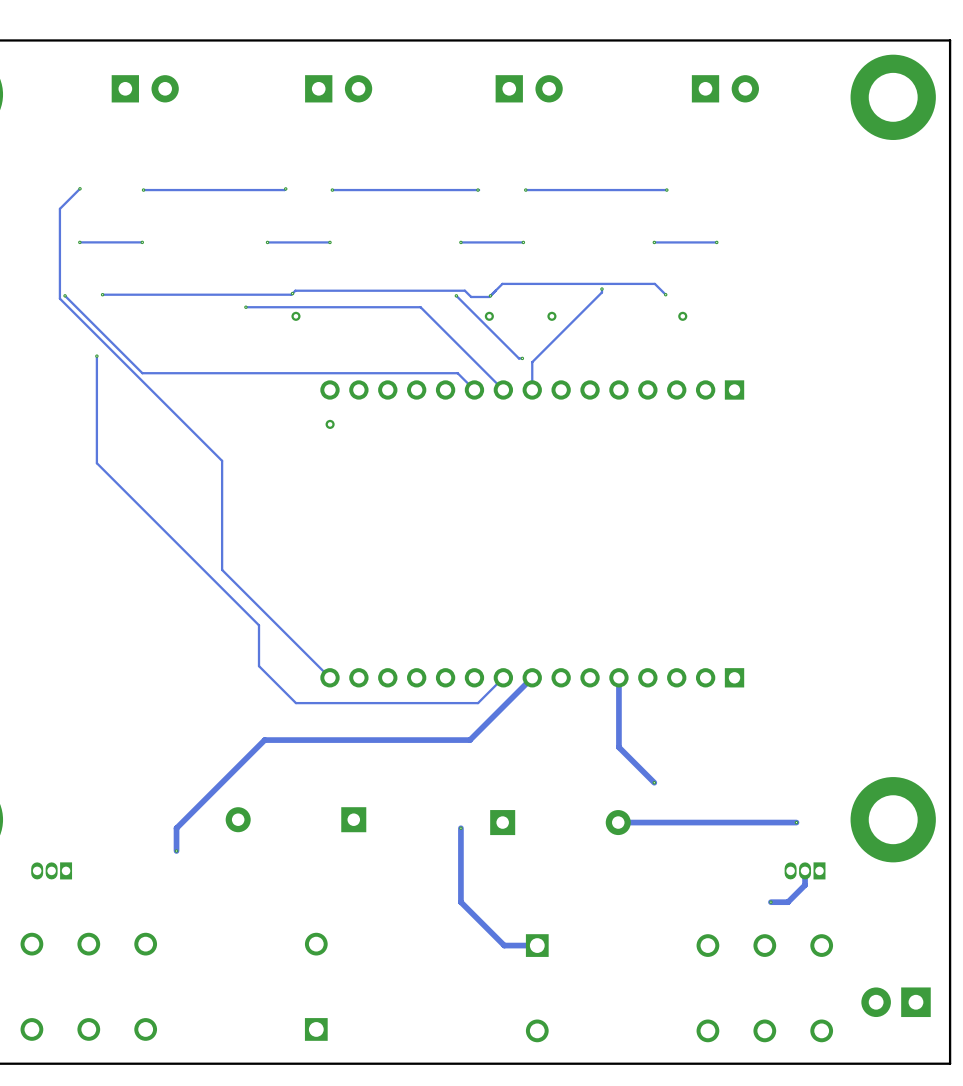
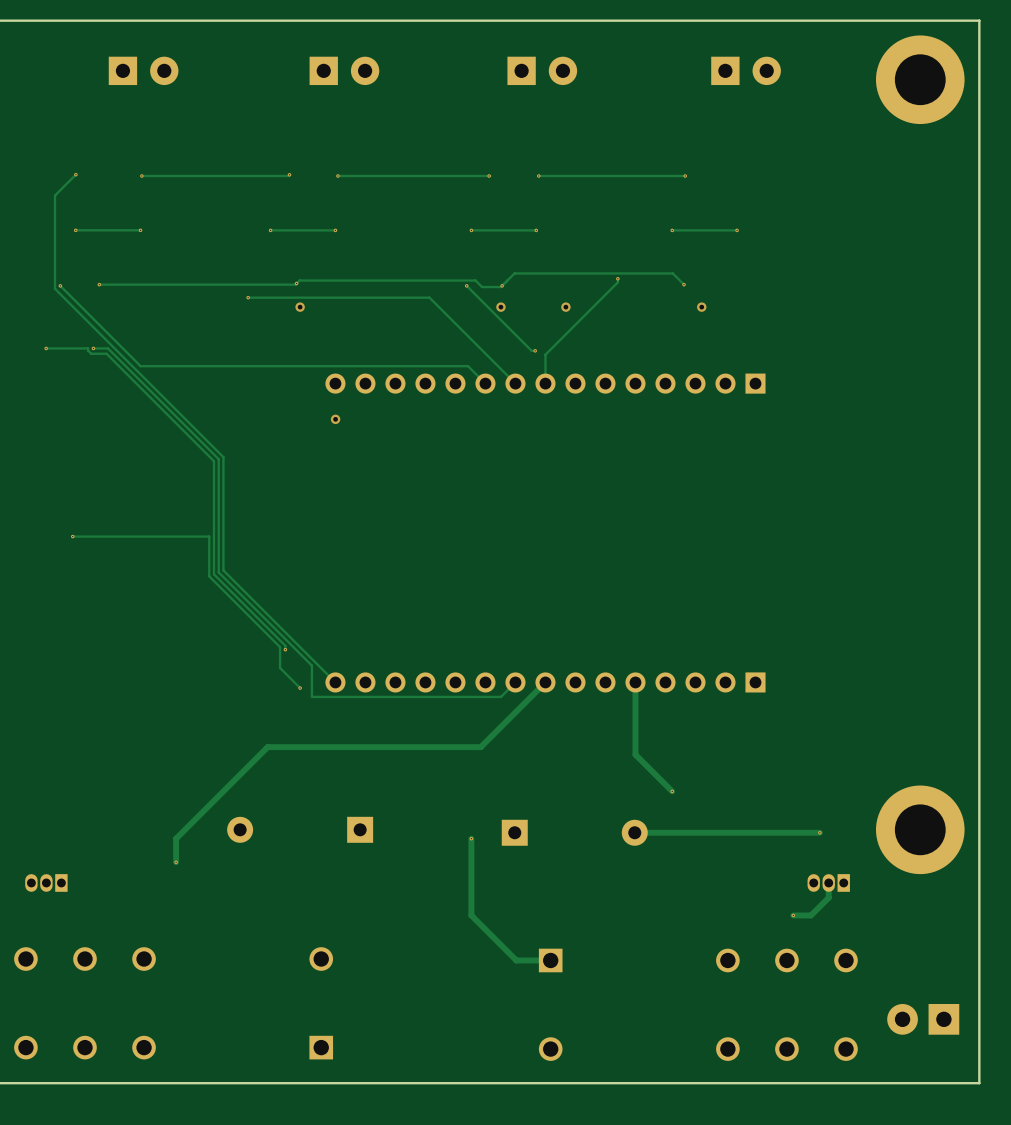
track: none -> (46, 348) (88, 348) (91, 353) (106, 353) (213, 461) (213, 574) (285, 645) (285, 649)
via: none -> (46, 348)
track: (96, 356) (96, 463) (259, 625) (259, 666) (295, 703) (478, 703) (489, 691) -> (93, 348) (107, 348) (218, 459) (218, 572) (311, 665) (311, 696) (501, 696)
track: none -> (72, 536) (209, 536) (209, 576) (280, 647) (280, 667) (300, 688)
via: none -> (72, 536)
via: none -> (285, 649)
via: none -> (300, 688)

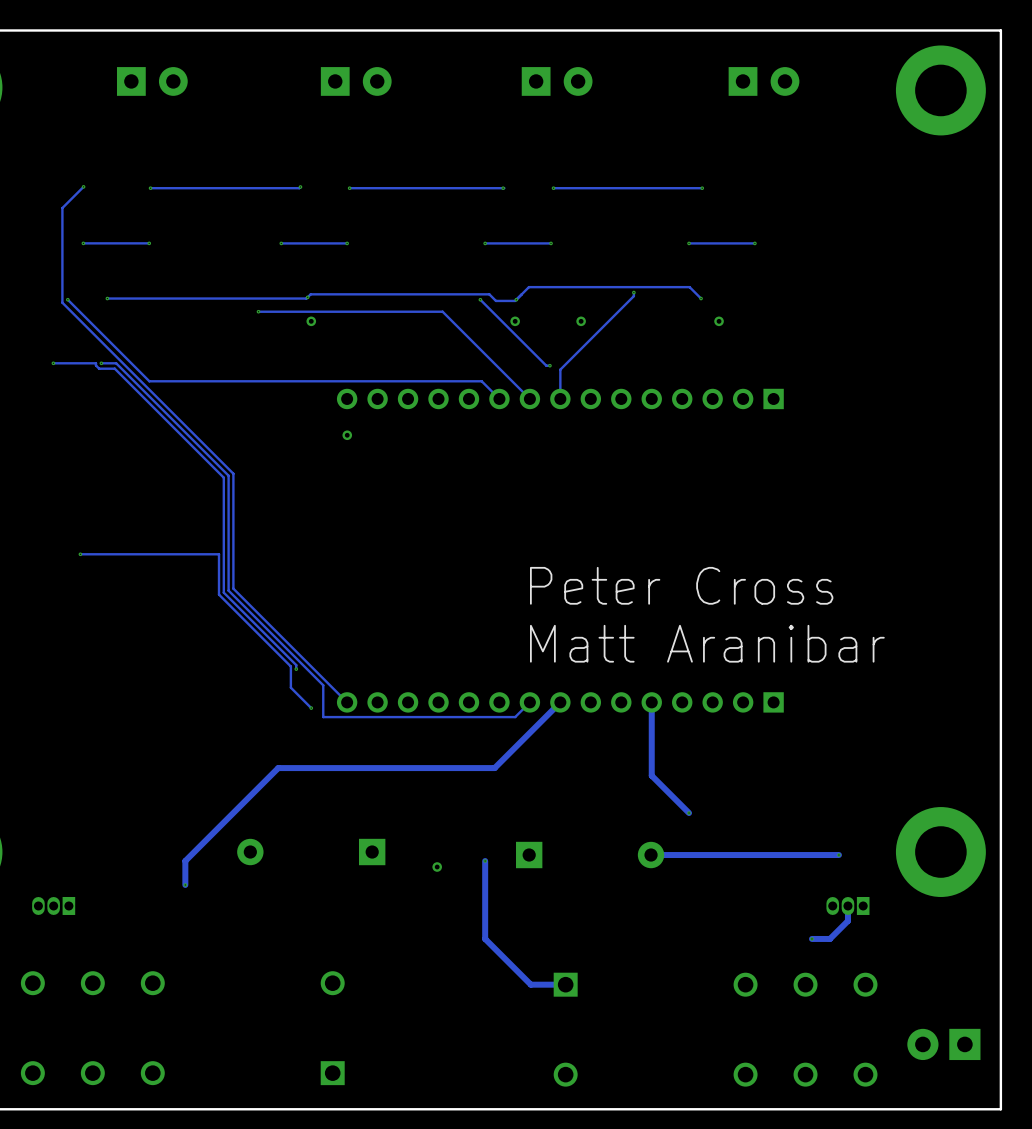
text: none -> Peter Cross (681, 585)
text: none -> Matt Aranibar (707, 643)
via: none -> (437, 867)

